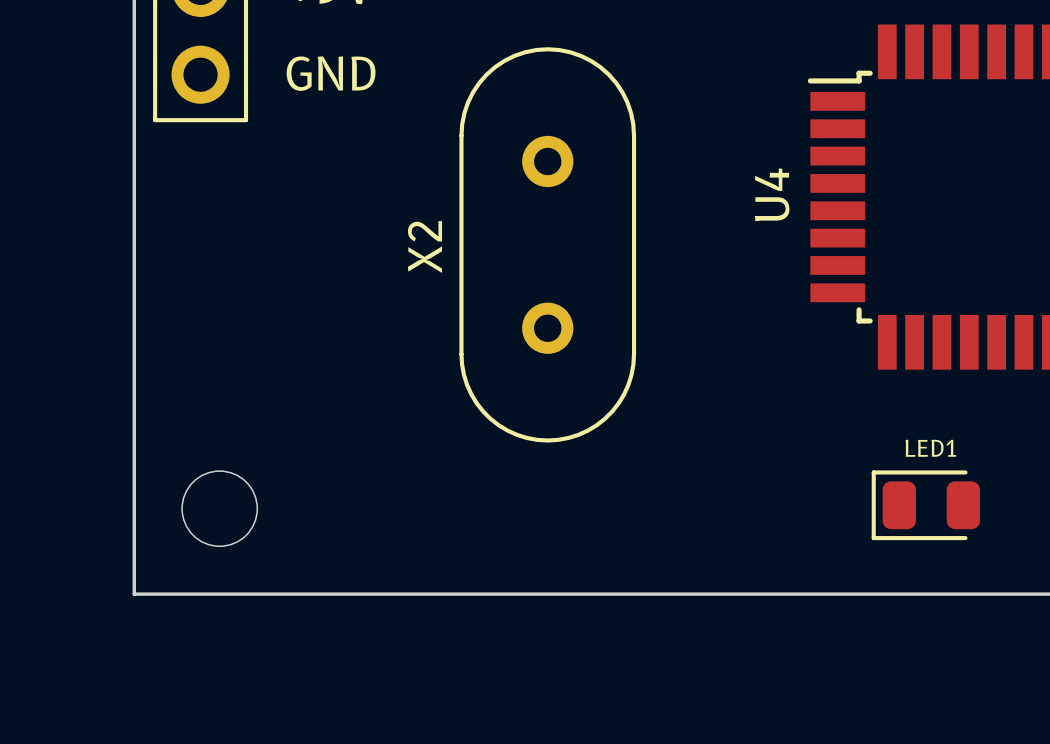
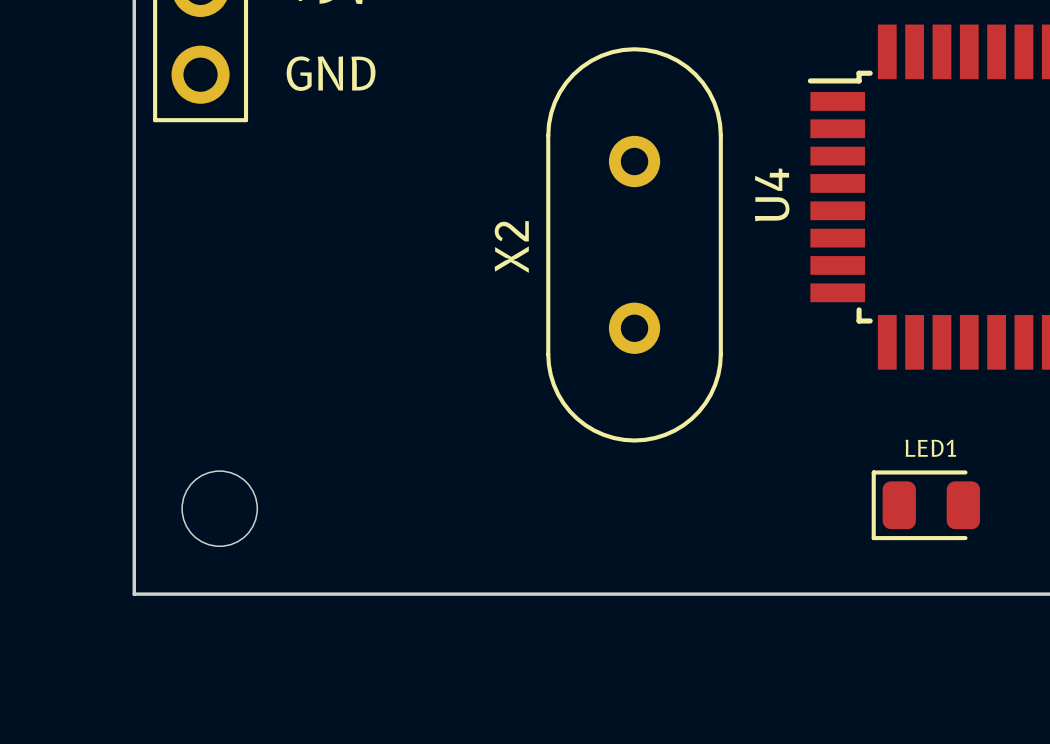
X2 position: (547, 244) -> (634, 244)

